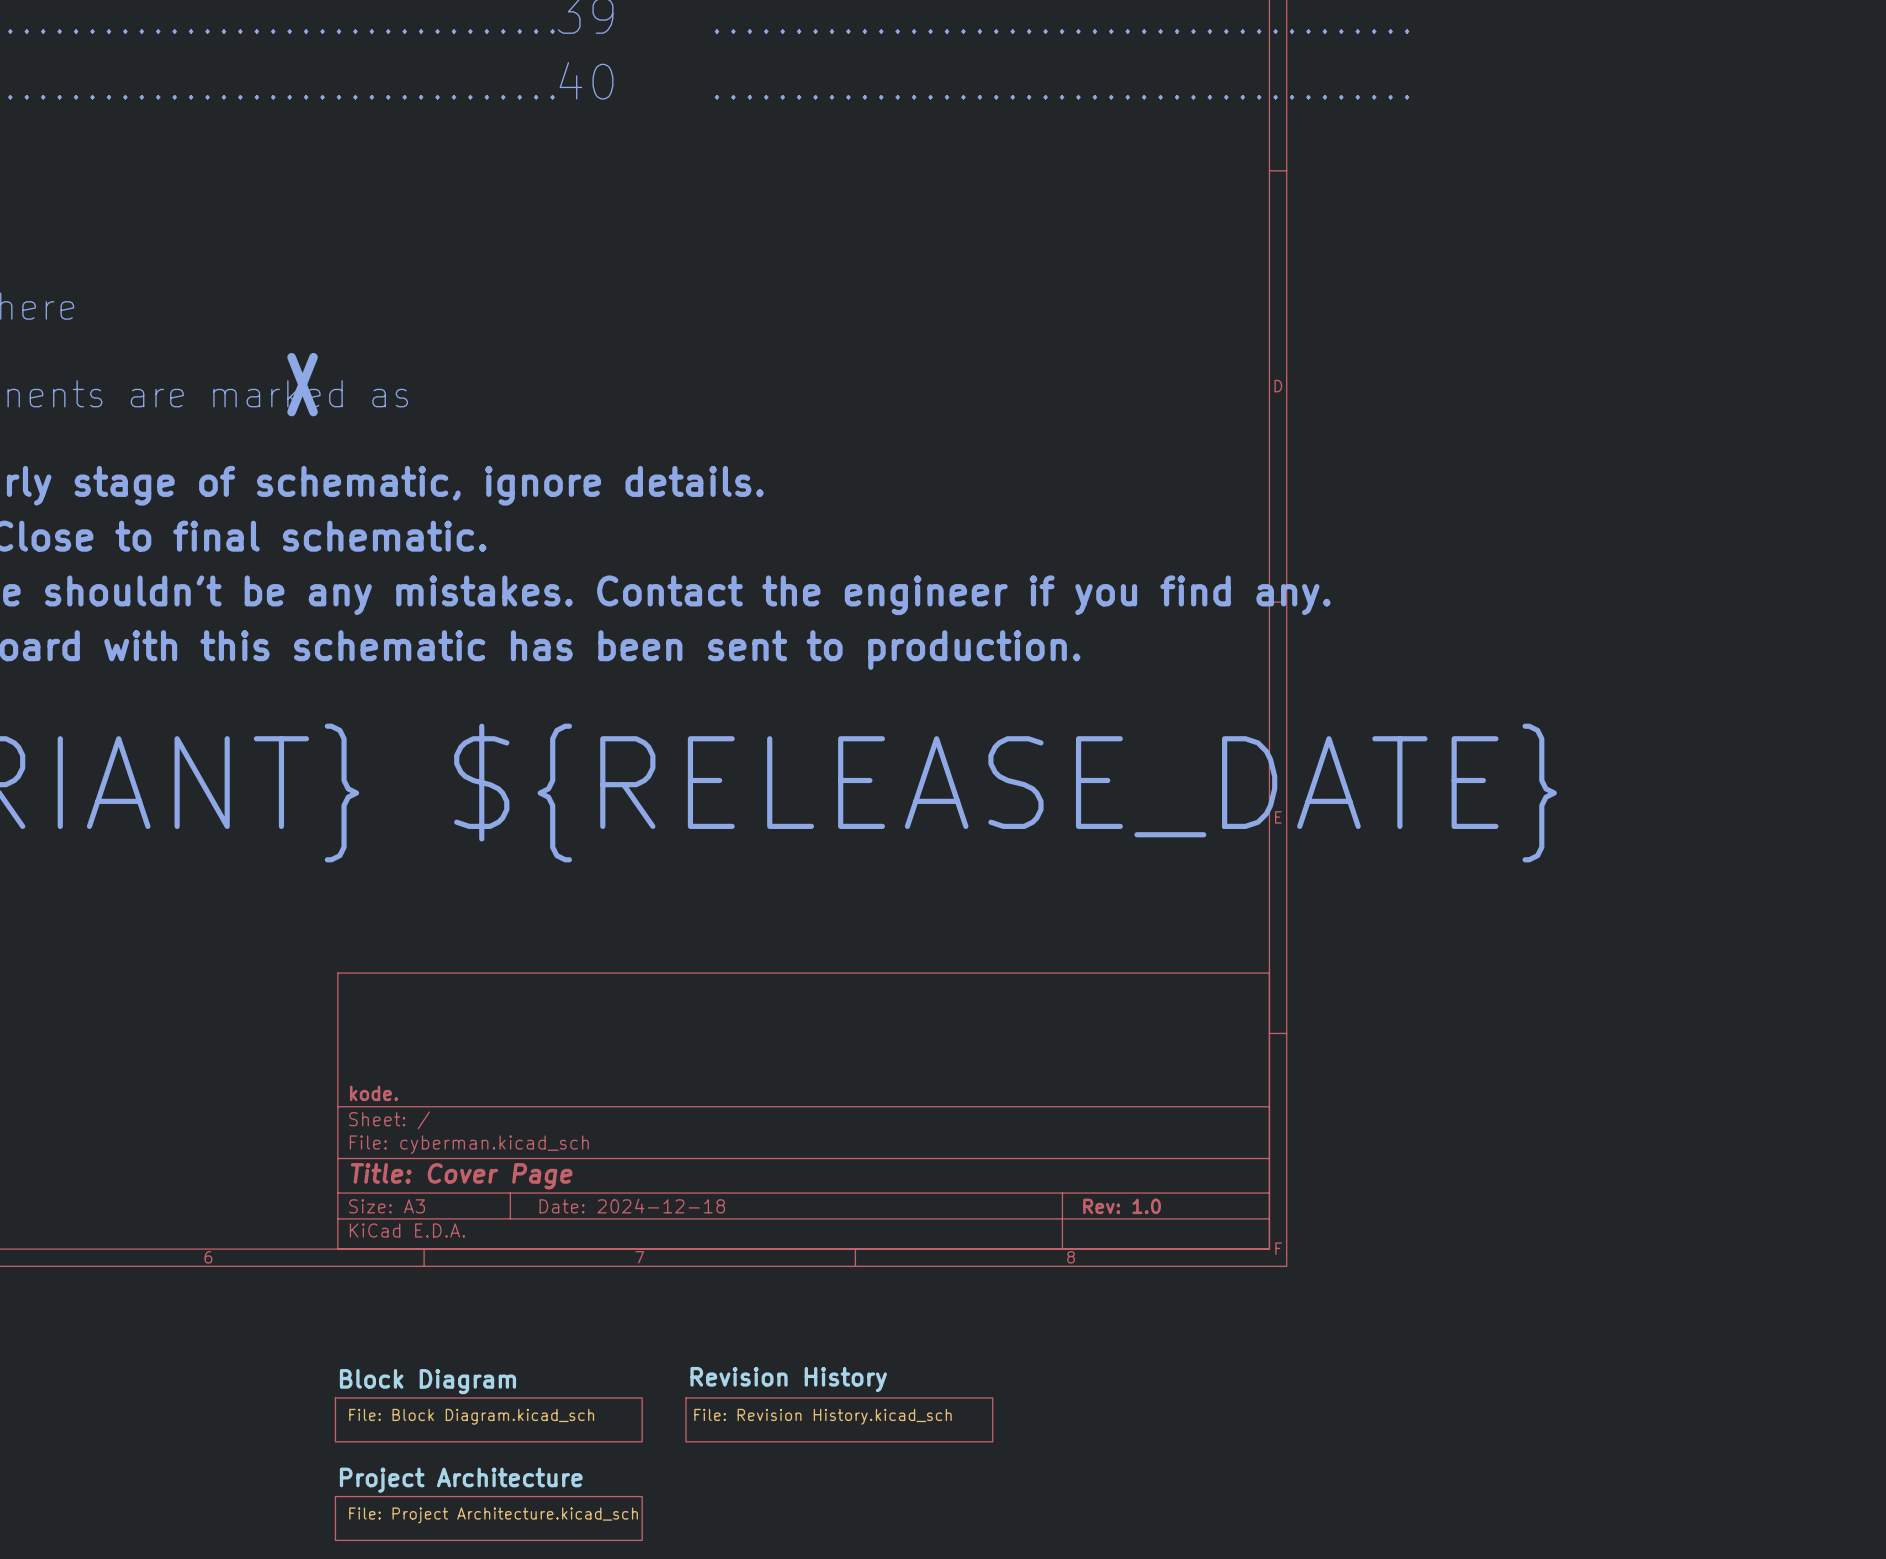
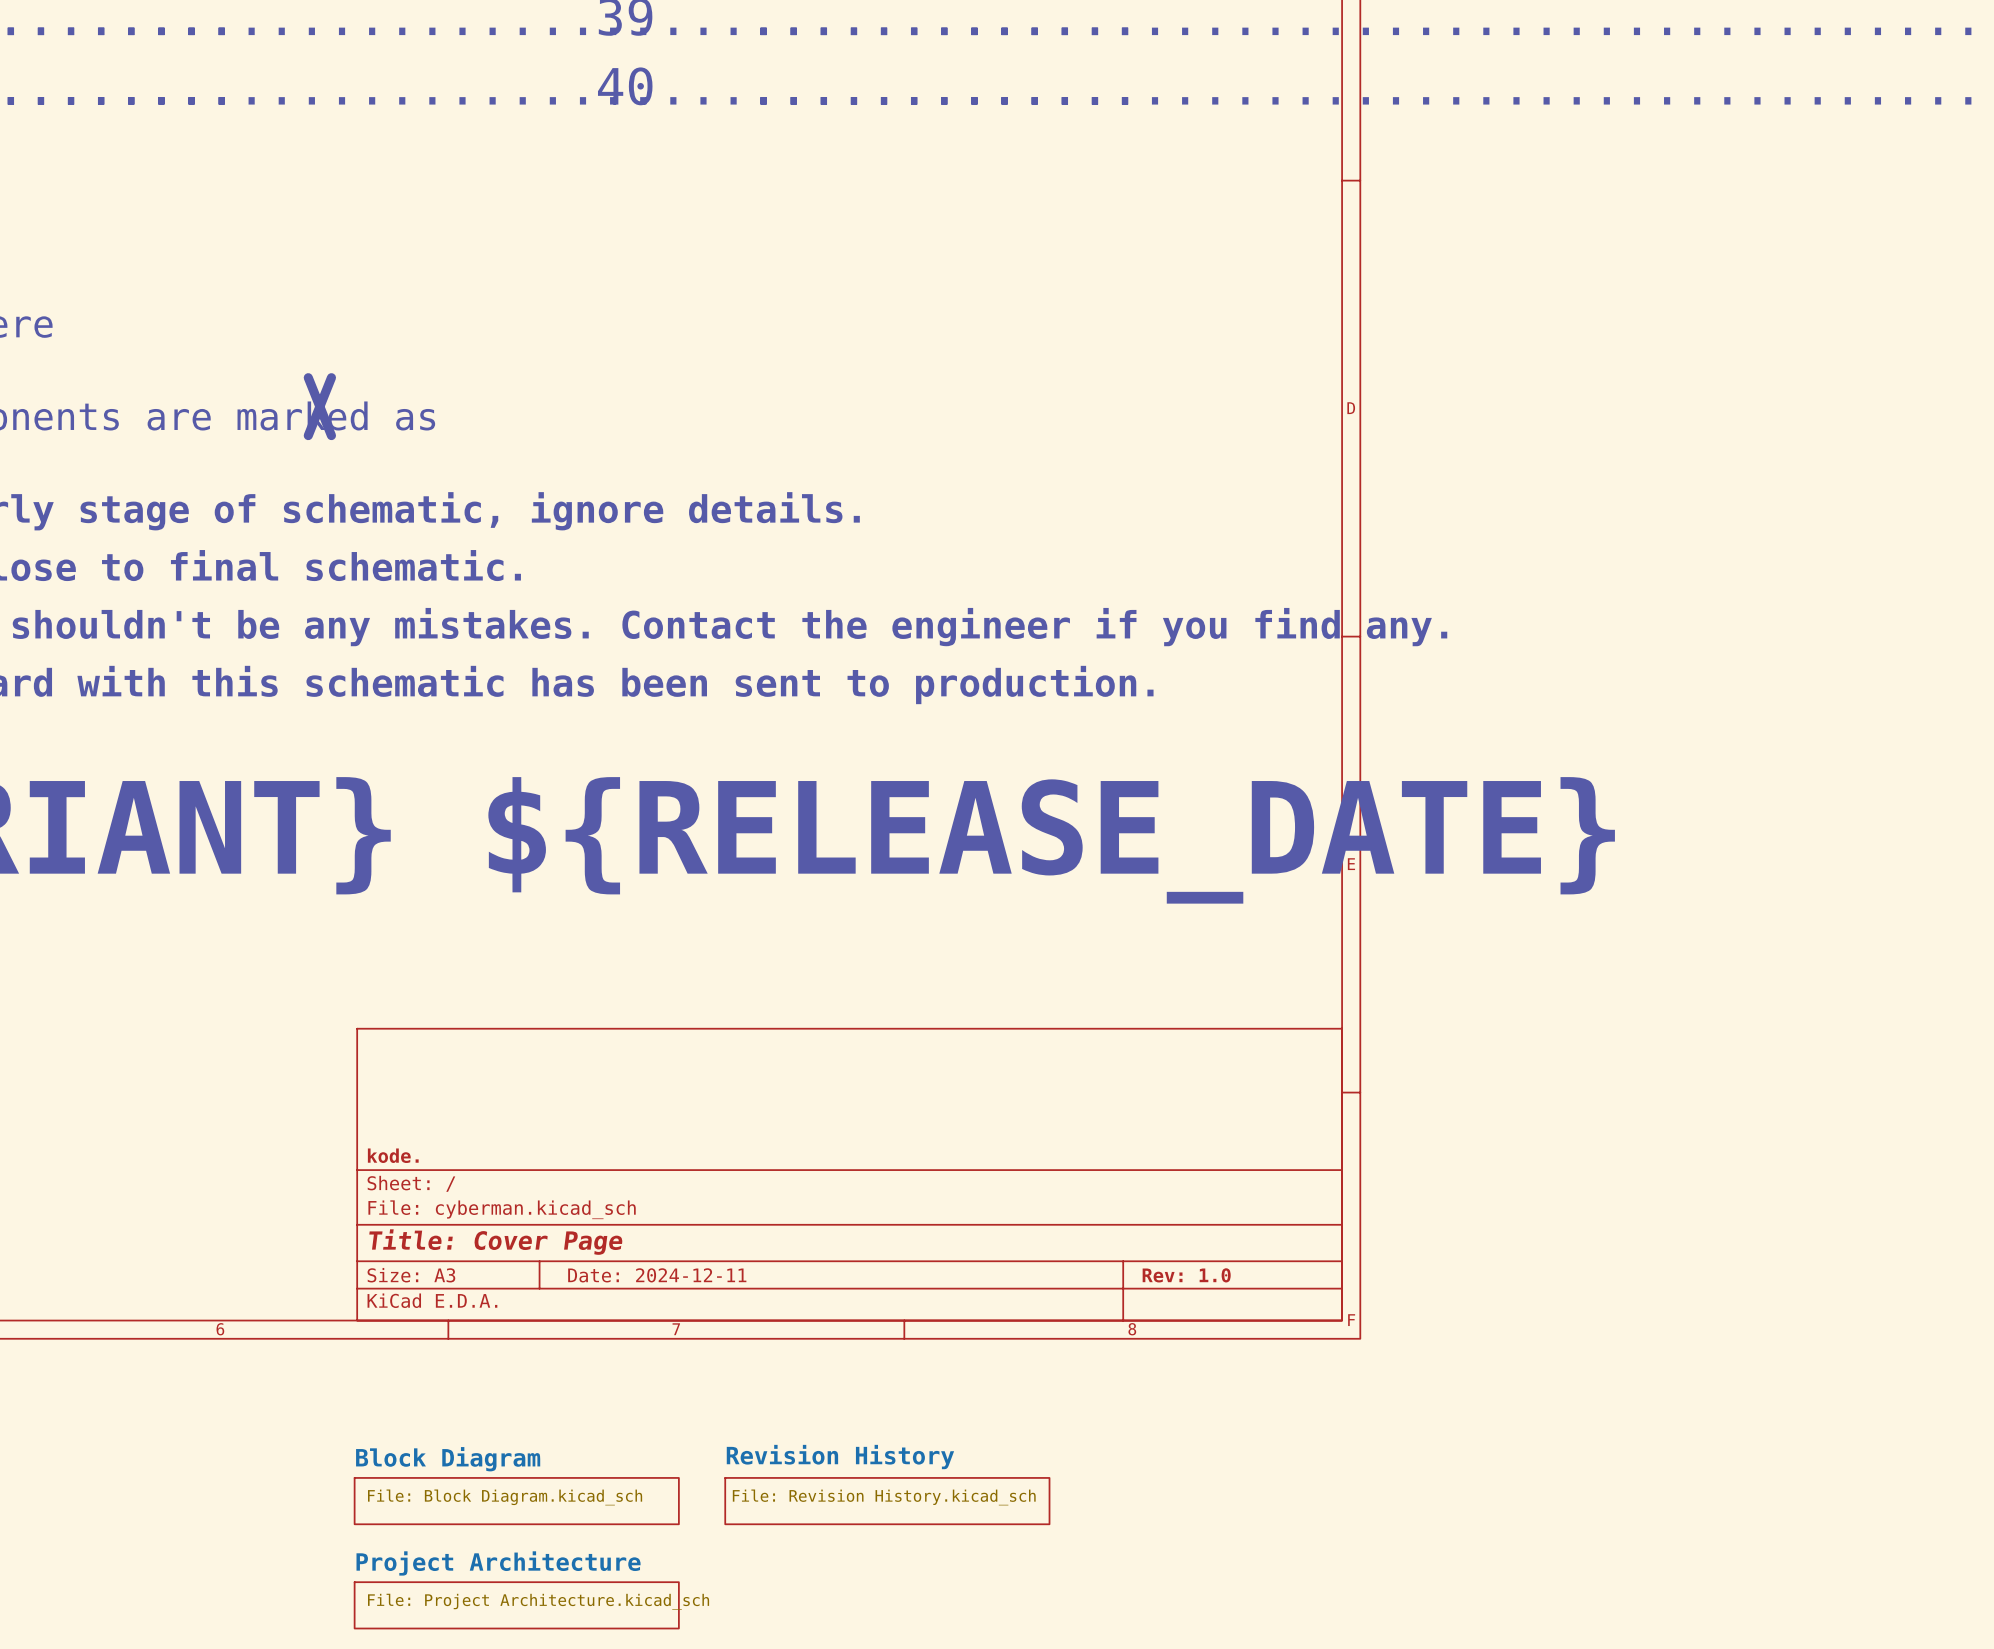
title block: Date: 2024-12-18 (632, 1206) -> Date: 2024-12-11 (657, 1275)

